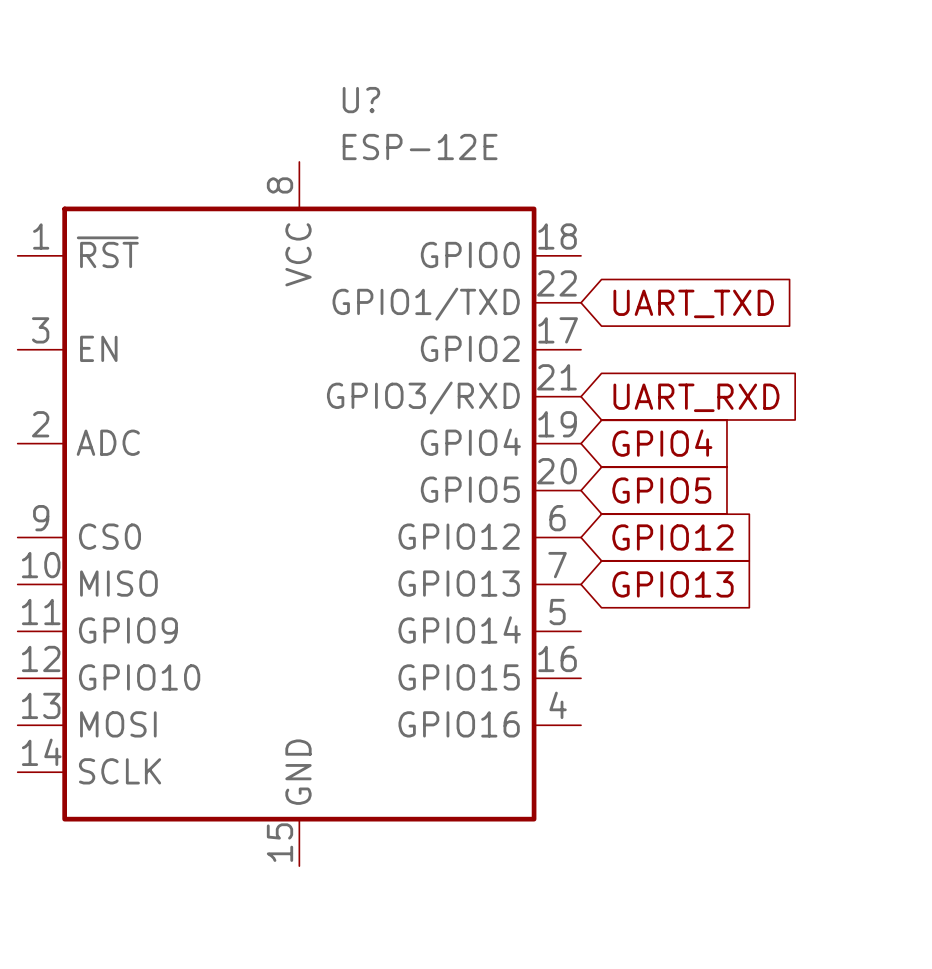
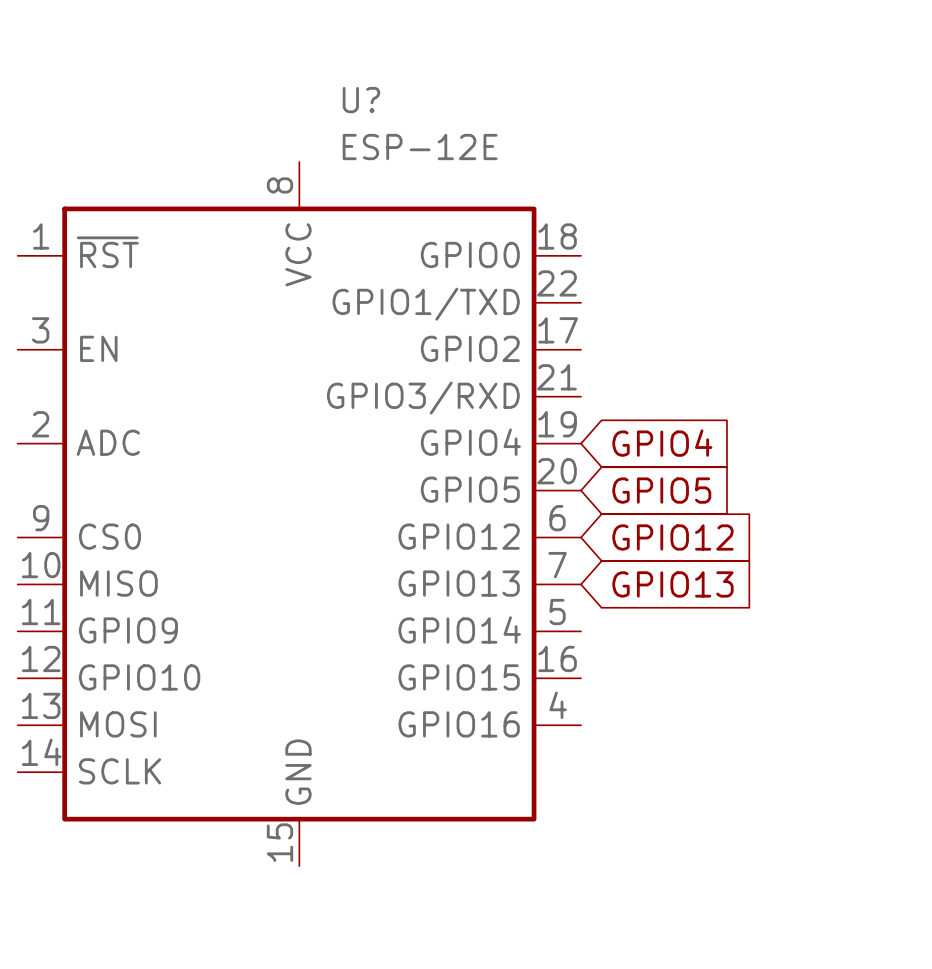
global label: UART_TXD (693, 303) -> none
global label: UART_RXD (696, 397) -> none

